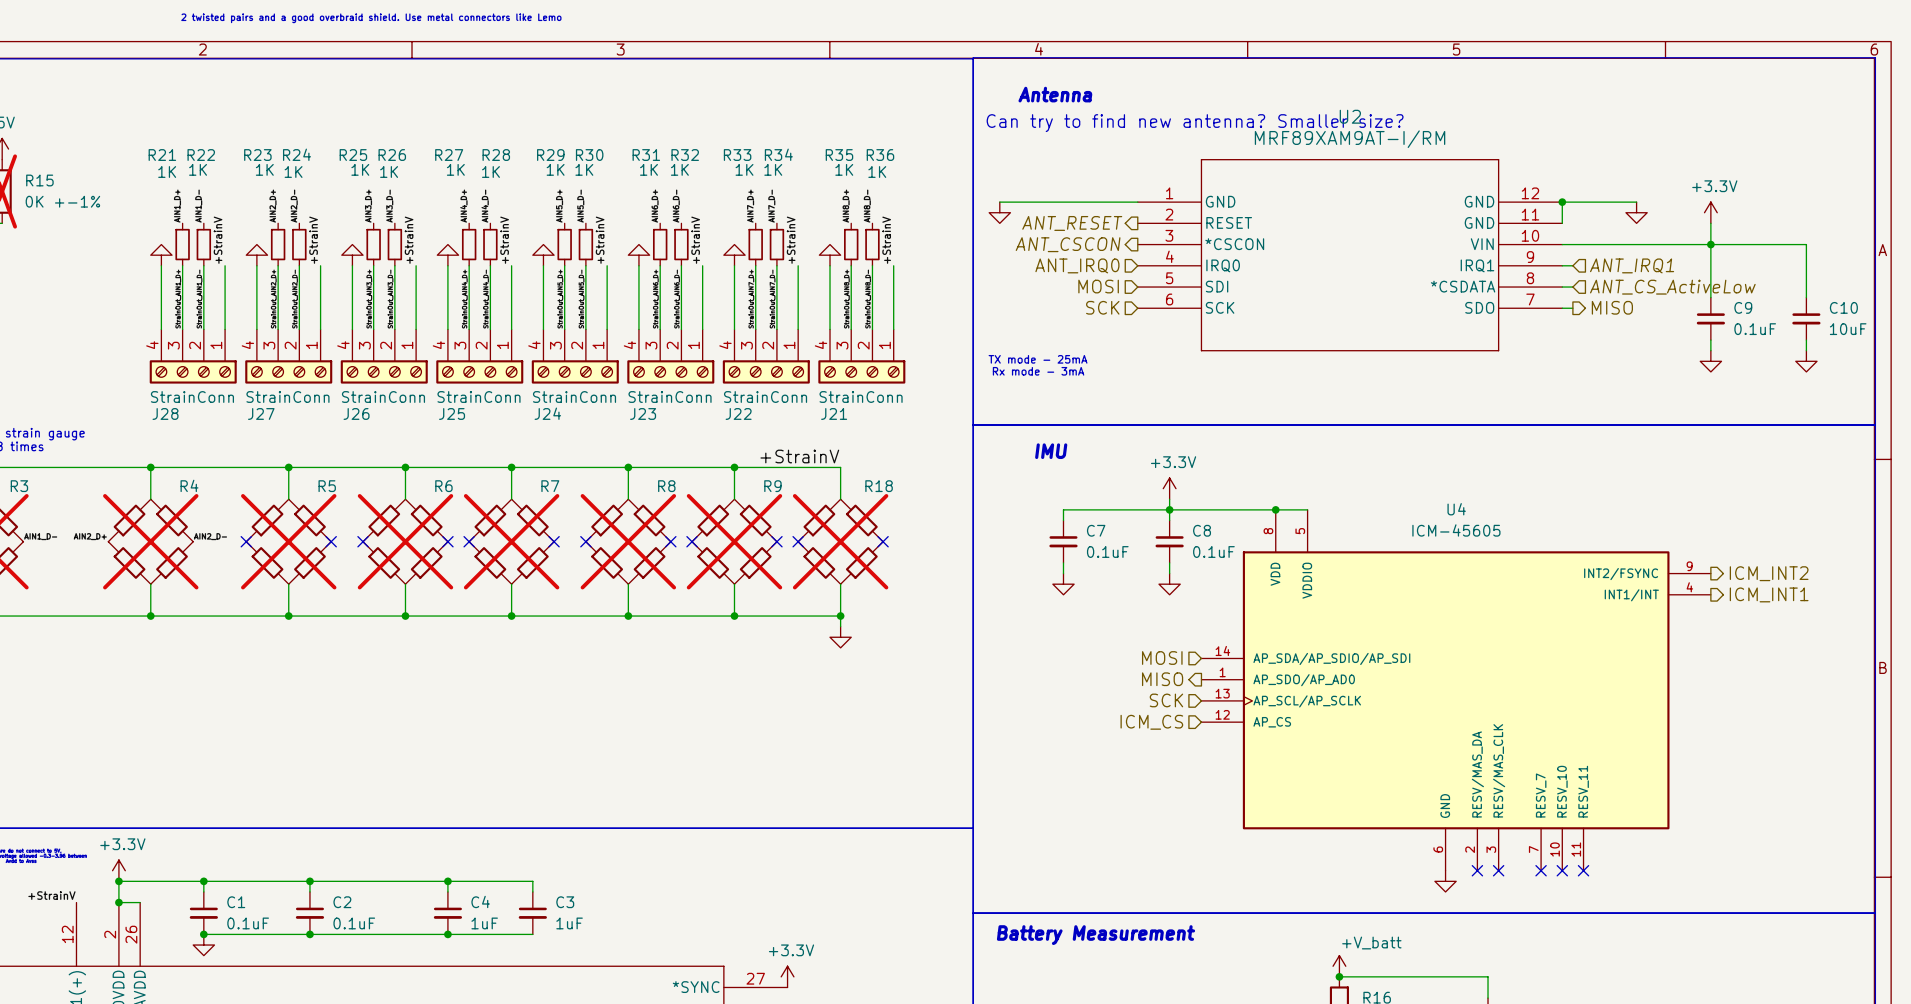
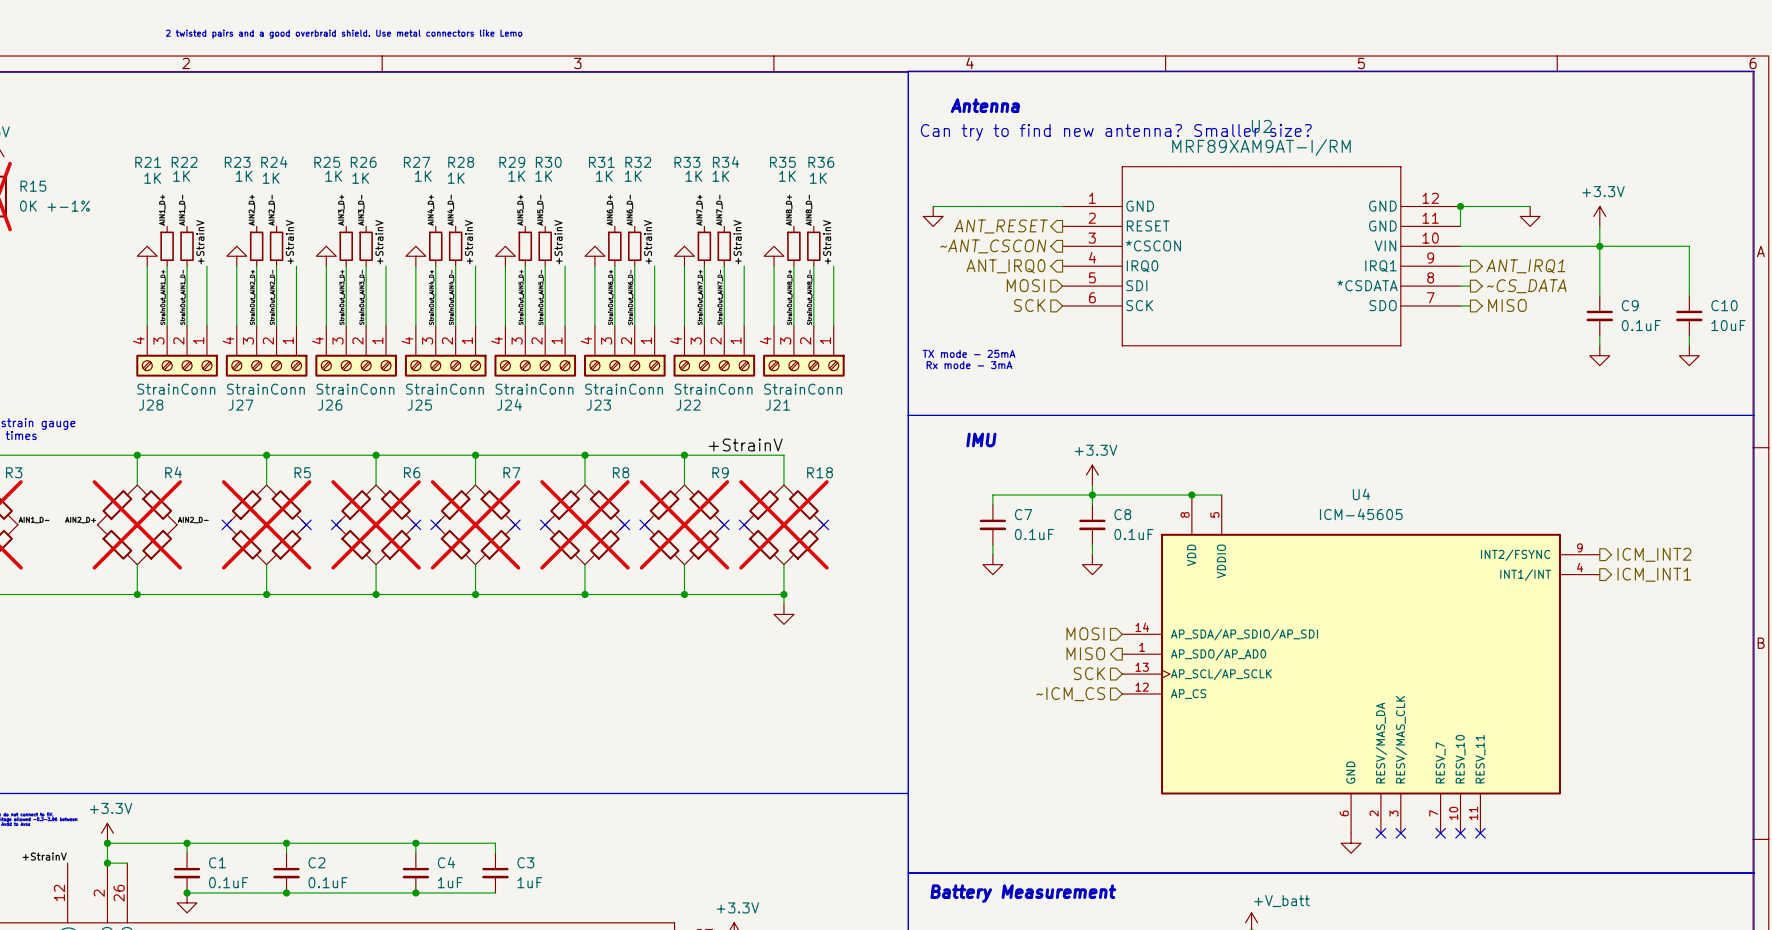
hierarchical label: ANT_CSCON (1068, 244) -> ~ANT_CSCON (993, 246)
hierarchical label shape: input (1077, 265) -> output (1005, 266)
hierarchical label shape: input (1632, 265) -> output (1525, 266)
hierarchical label shape: input (1672, 287) -> output (1526, 286)
hierarchical label: ANT_CS_ActiveLow (1672, 287) -> ~CS_DATA (1526, 286)
hierarchical label: ICM_CS (1151, 722) -> ~ICM_CS (1070, 694)

